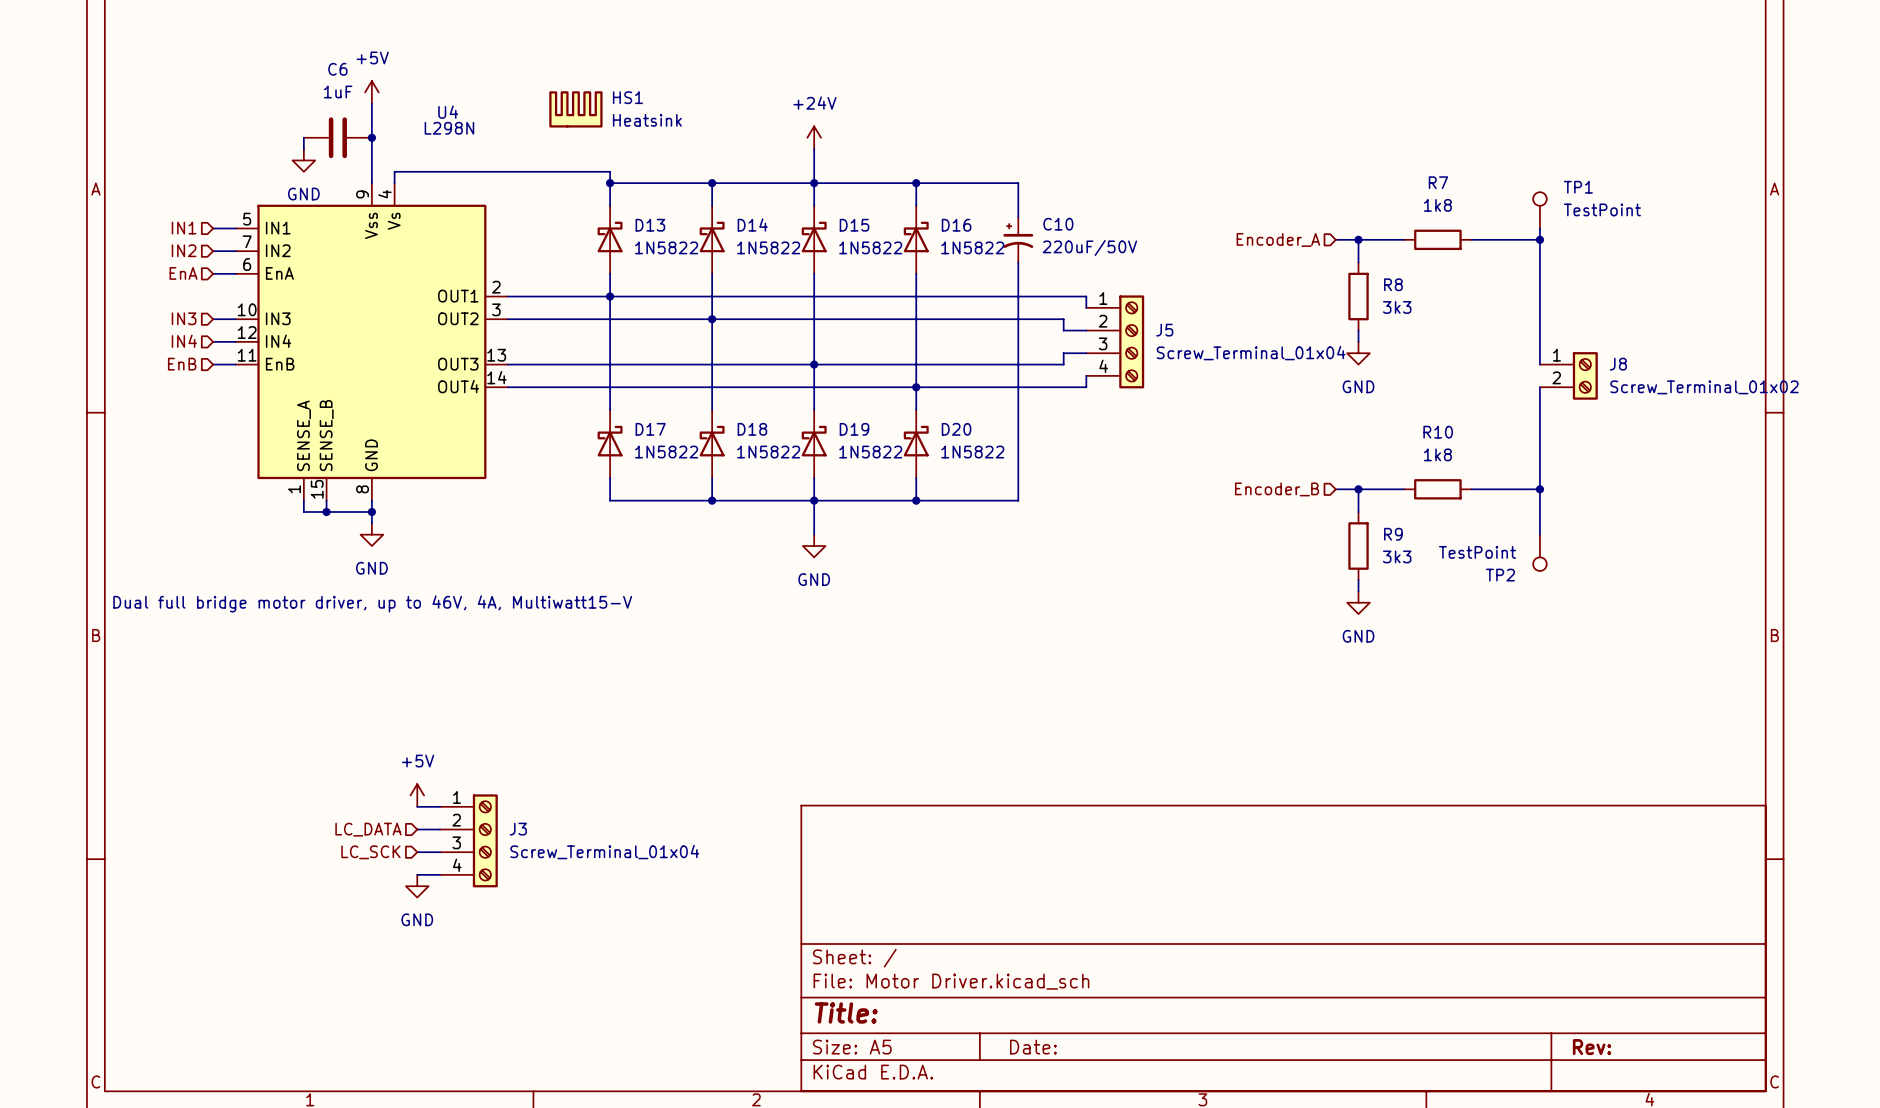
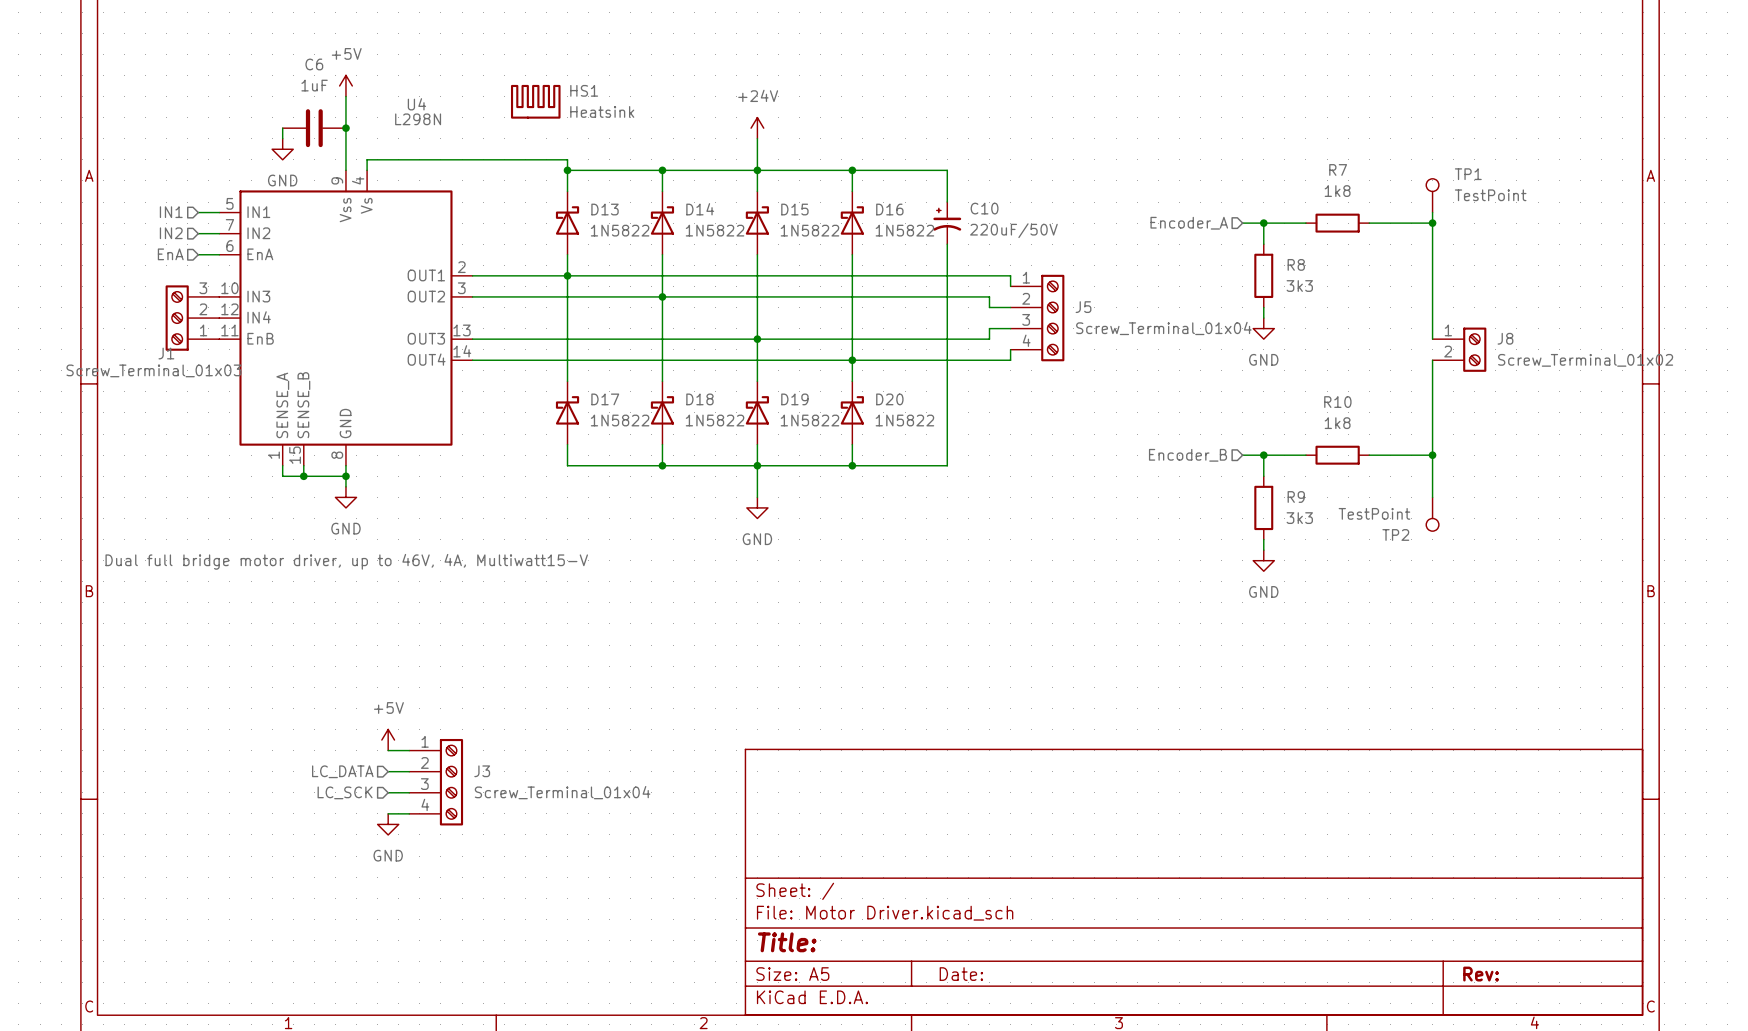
hierarchical label: IN3 (184, 318) -> none
hierarchical label: IN4 (184, 341) -> none
J1: none -> Screw_Terminal_01x03 (192, 318)
hierarchical label: EnB (182, 364) -> none

